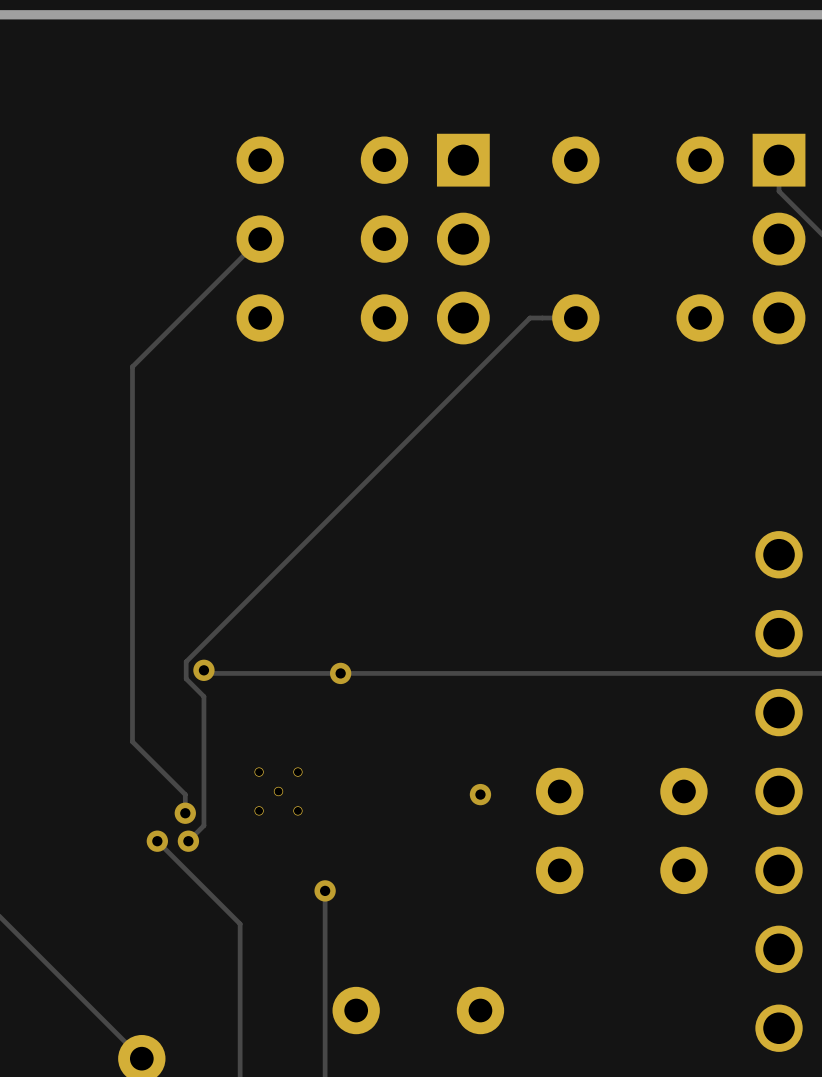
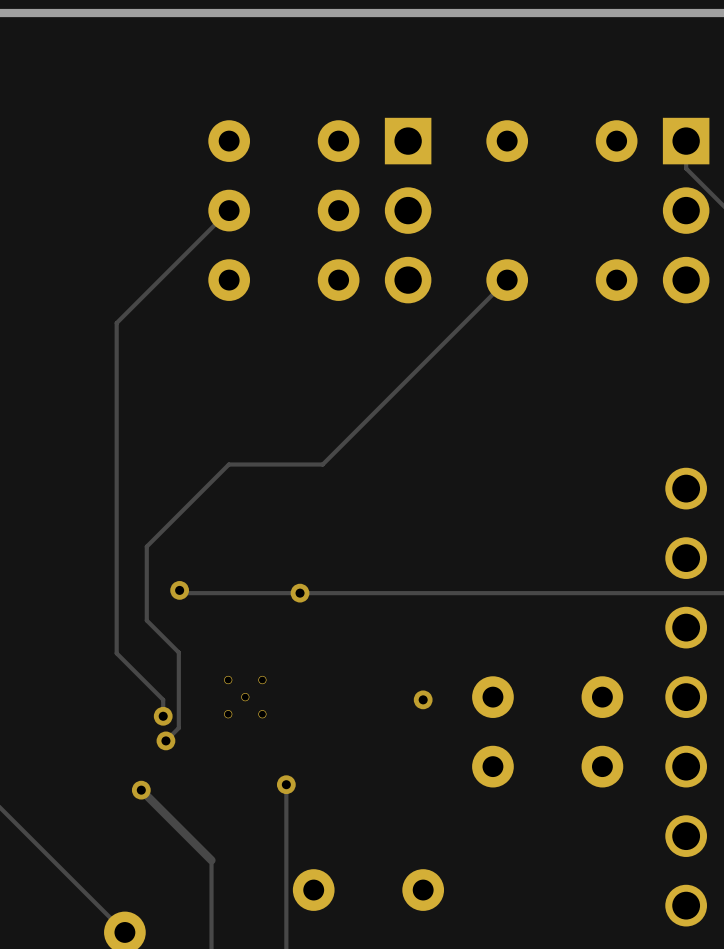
track: (575, 318) (529, 318) (186, 661) (186, 678) (203, 696) (203, 826) -> (507, 280) (322, 464) (228, 464) (146, 546) (146, 620) (178, 652) (178, 728)
track: (157, 841) (240, 923) (240, 976) -> (141, 790) (211, 860)
via position: (157, 841) -> (141, 790)

